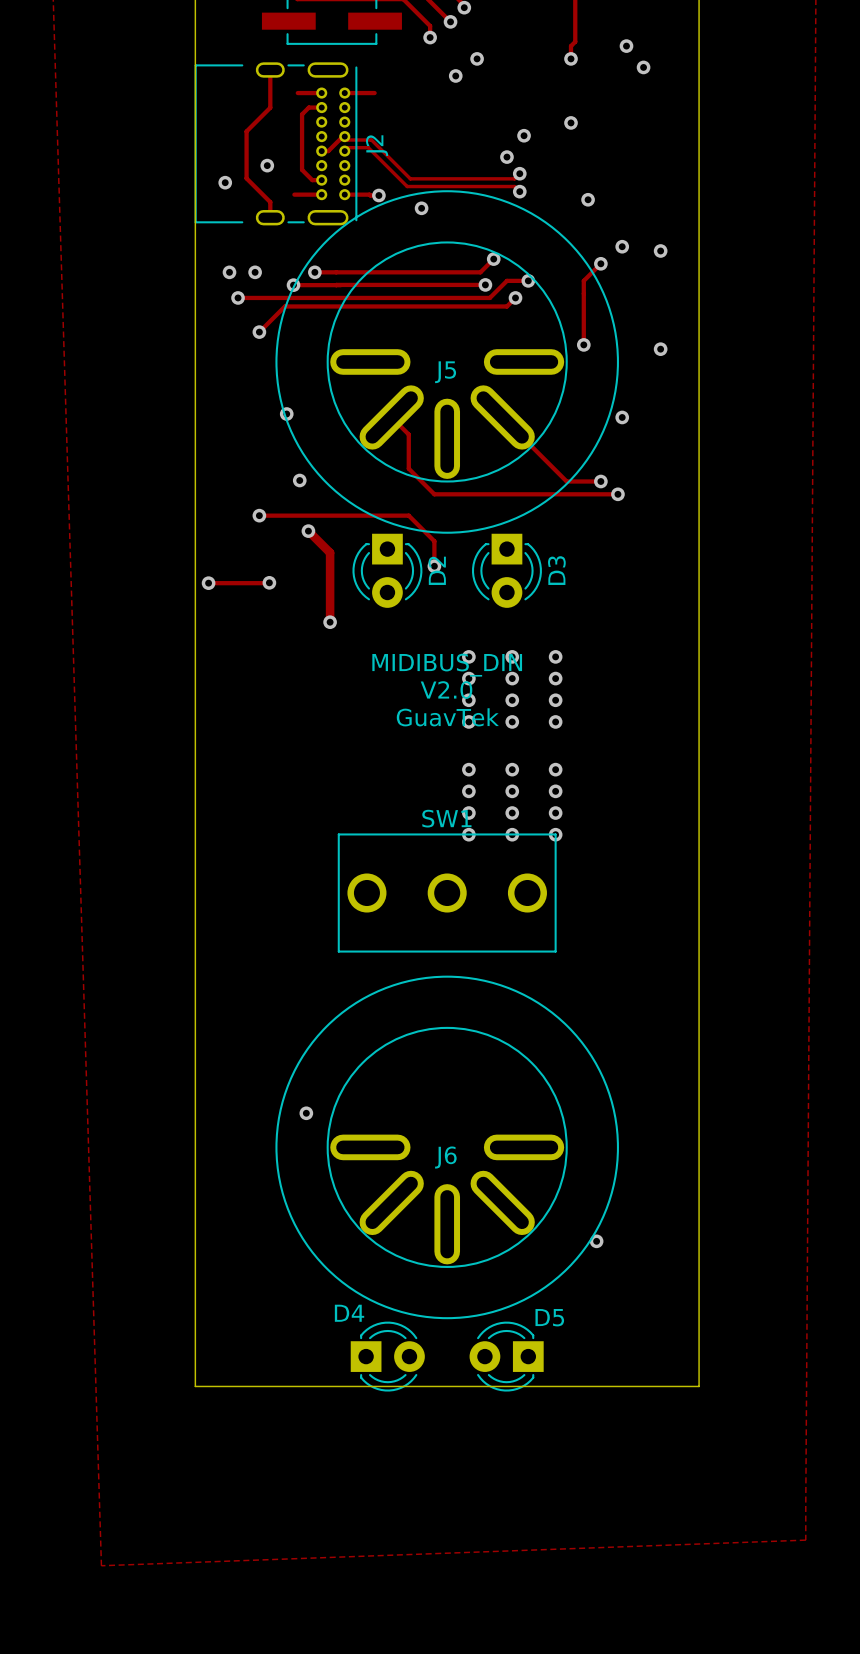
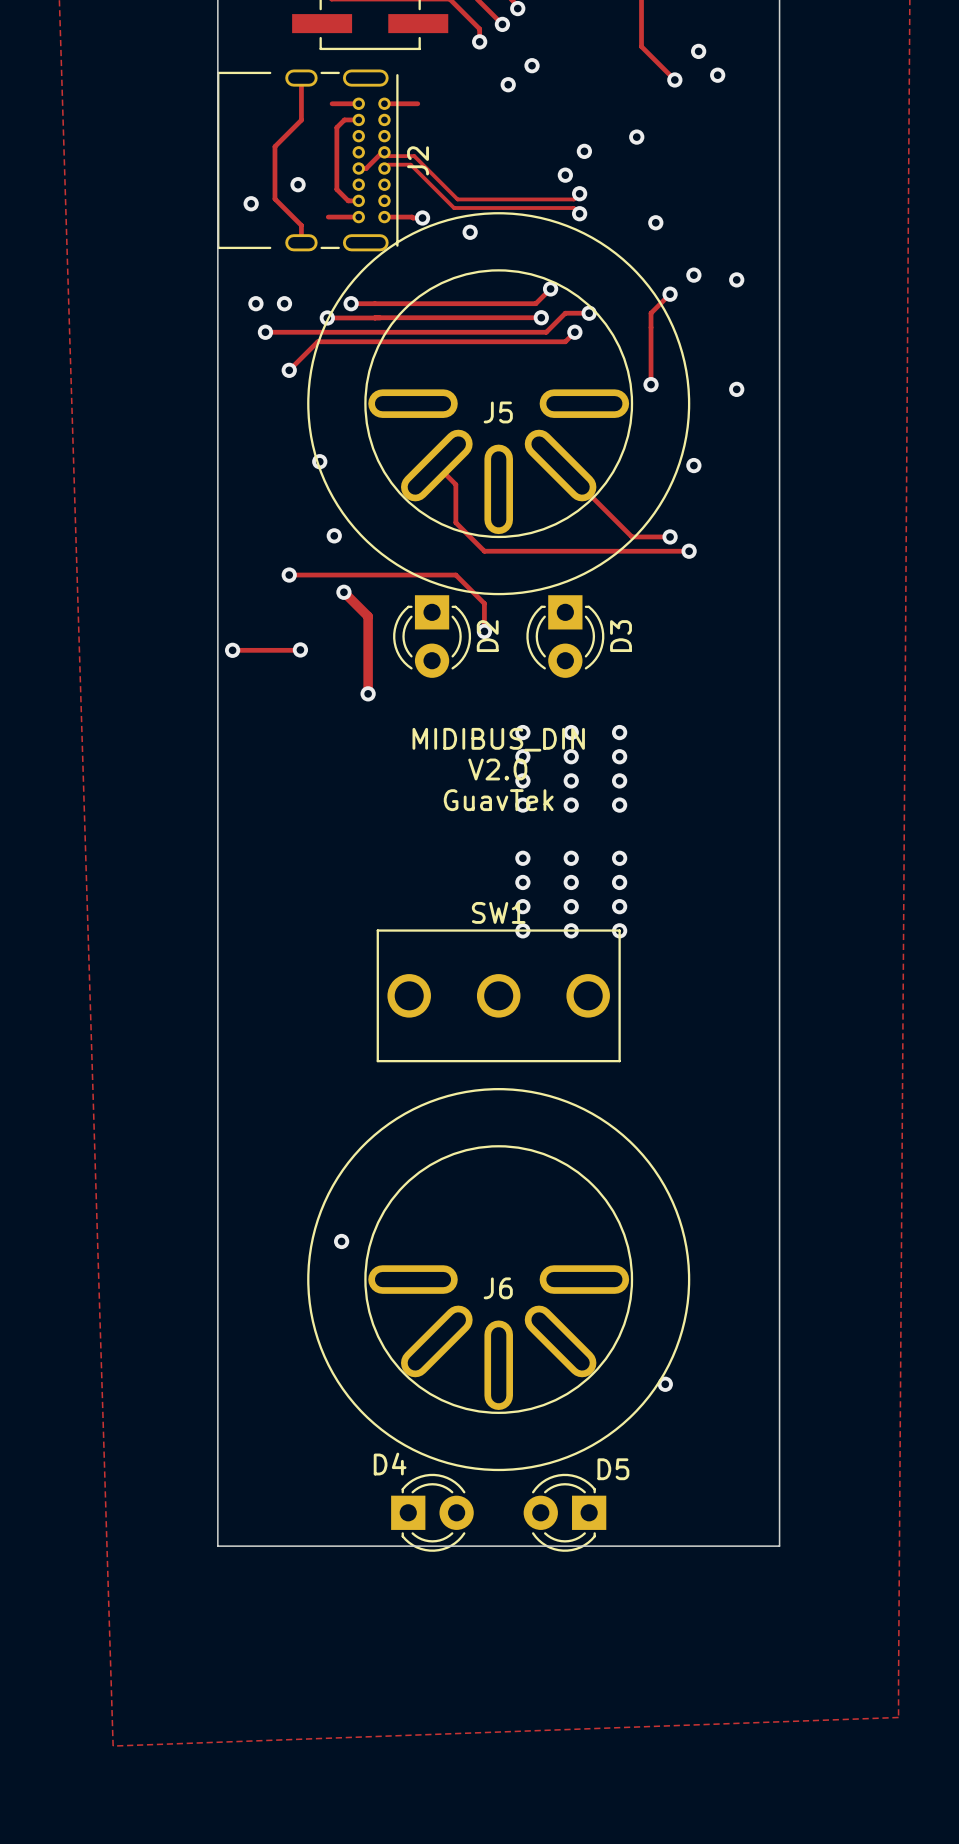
track: (575, 41) (571, 46) (571, 58) -> (641, 46) (674, 79)
via position: (571, 58) -> (674, 79)

